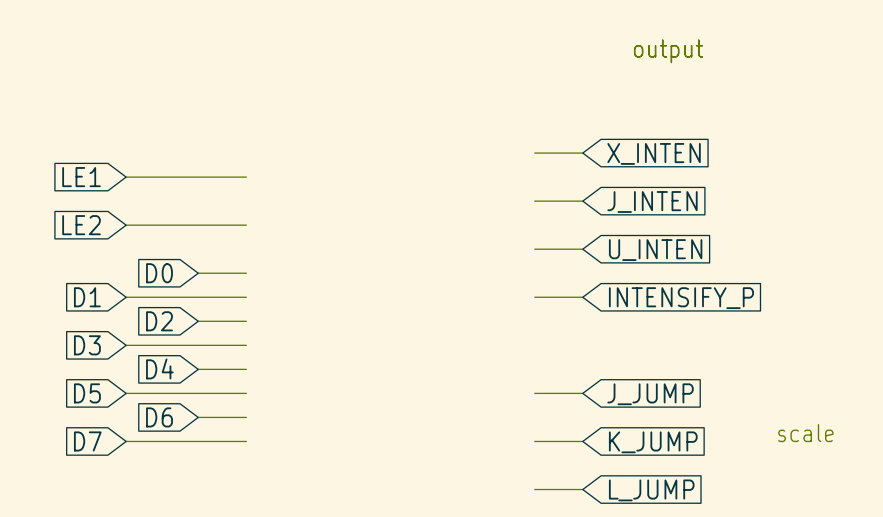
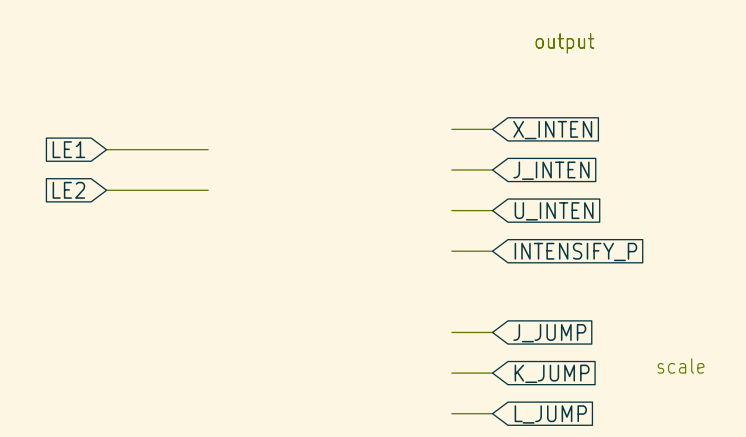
global label: D0 (159, 273) -> none
wire: (198, 273) (246, 273) -> none
global label: D1 (87, 297) -> none
wire: (126, 297) (246, 297) -> none
global label: D2 (159, 321) -> none
wire: (198, 321) (246, 321) -> none
global label: D3 (87, 345) -> none
wire: (126, 345) (246, 345) -> none
global label: D4 (159, 368) -> none
wire: (198, 369) (246, 369) -> none
global label: D5 (87, 393) -> none
wire: (126, 393) (246, 393) -> none
global label: D6 (159, 417) -> none
wire: (198, 417) (246, 417) -> none
global label: D7 (87, 441) -> none
wire: (126, 441) (246, 441) -> none

